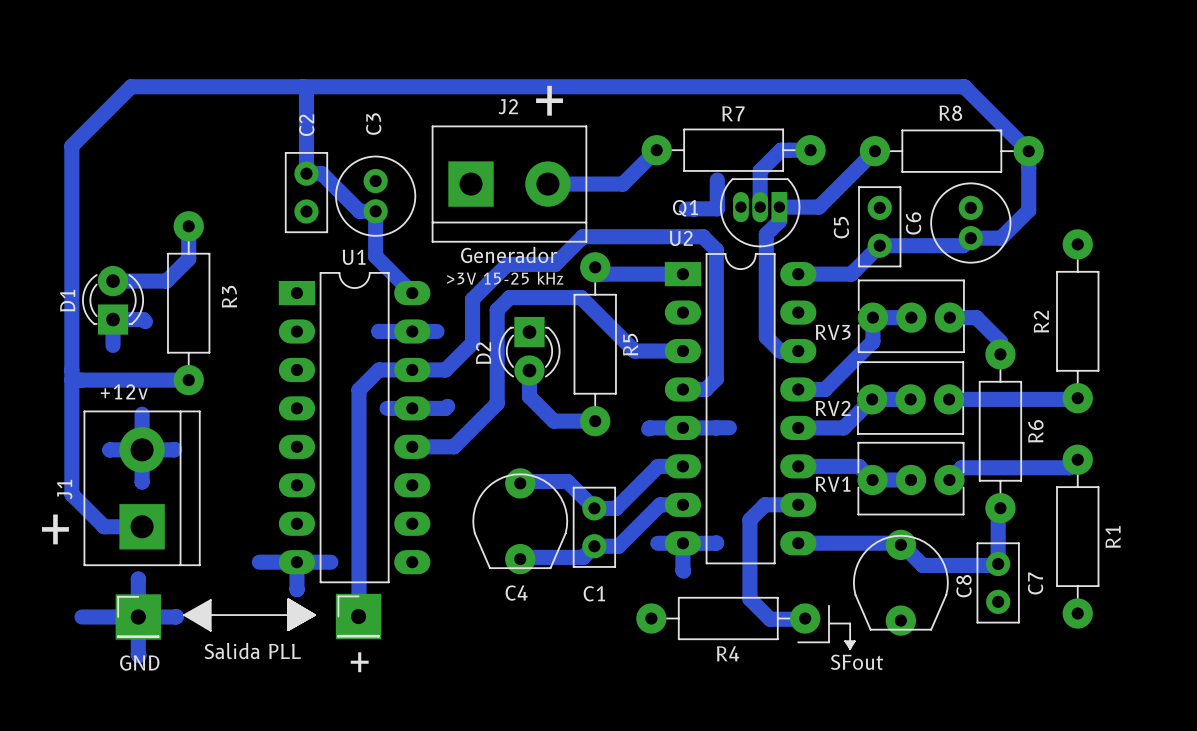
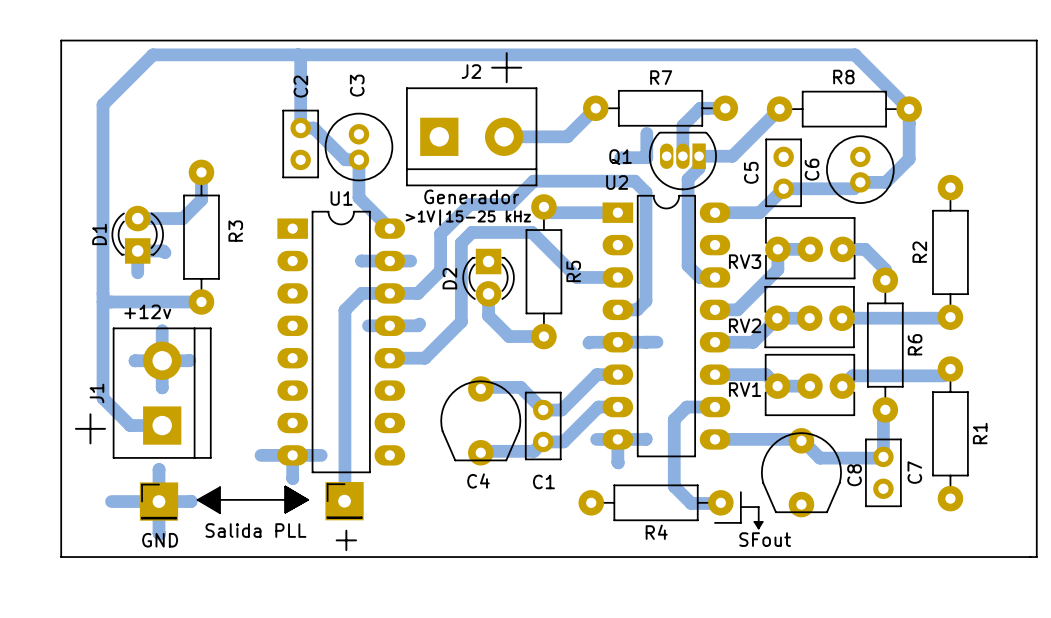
board edge: none -> (61, 40) (61, 557) (1036, 557) (1036, 40) (61, 40)
text: >3V 15-25 kHz (505, 278) -> >1V|15-25 kHz (468, 217)

